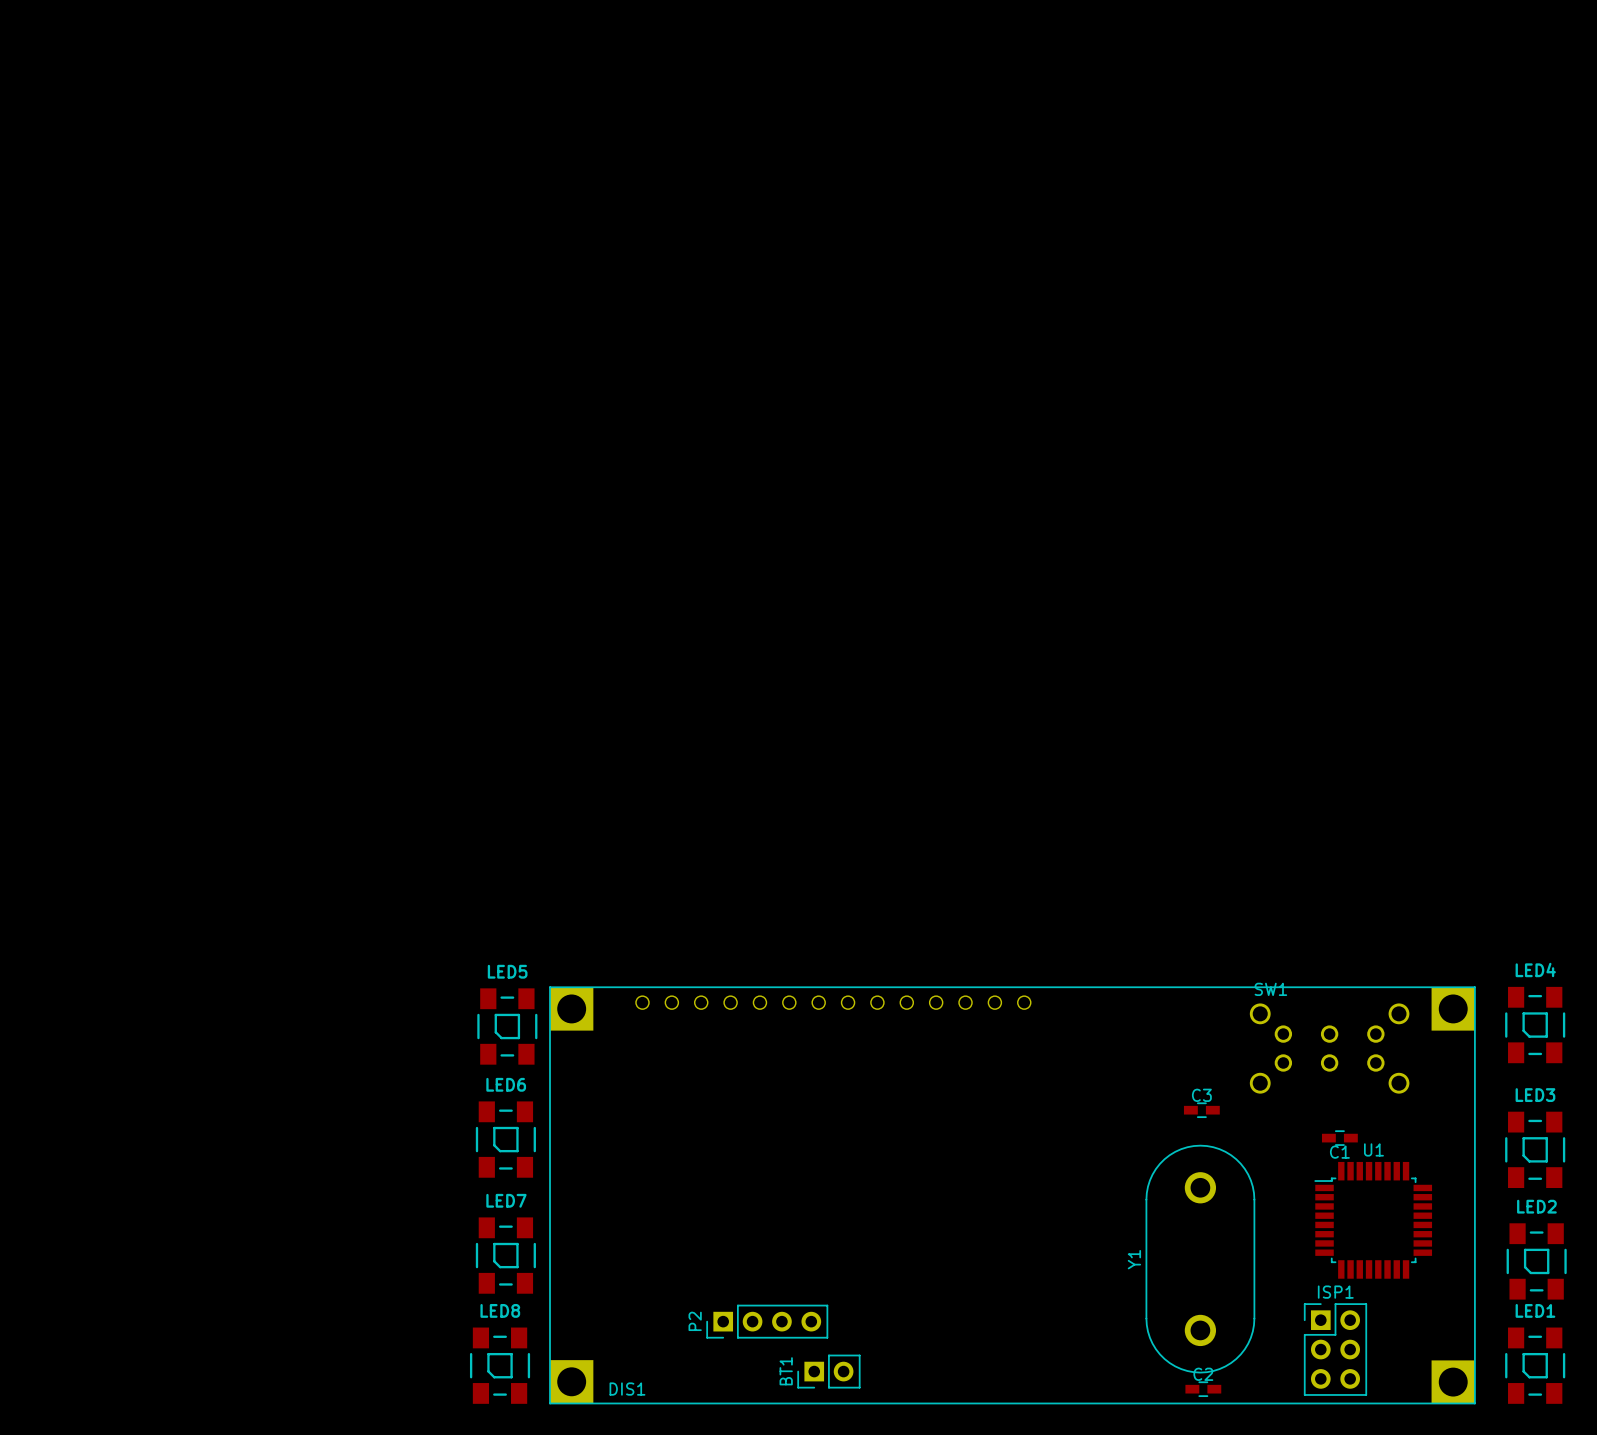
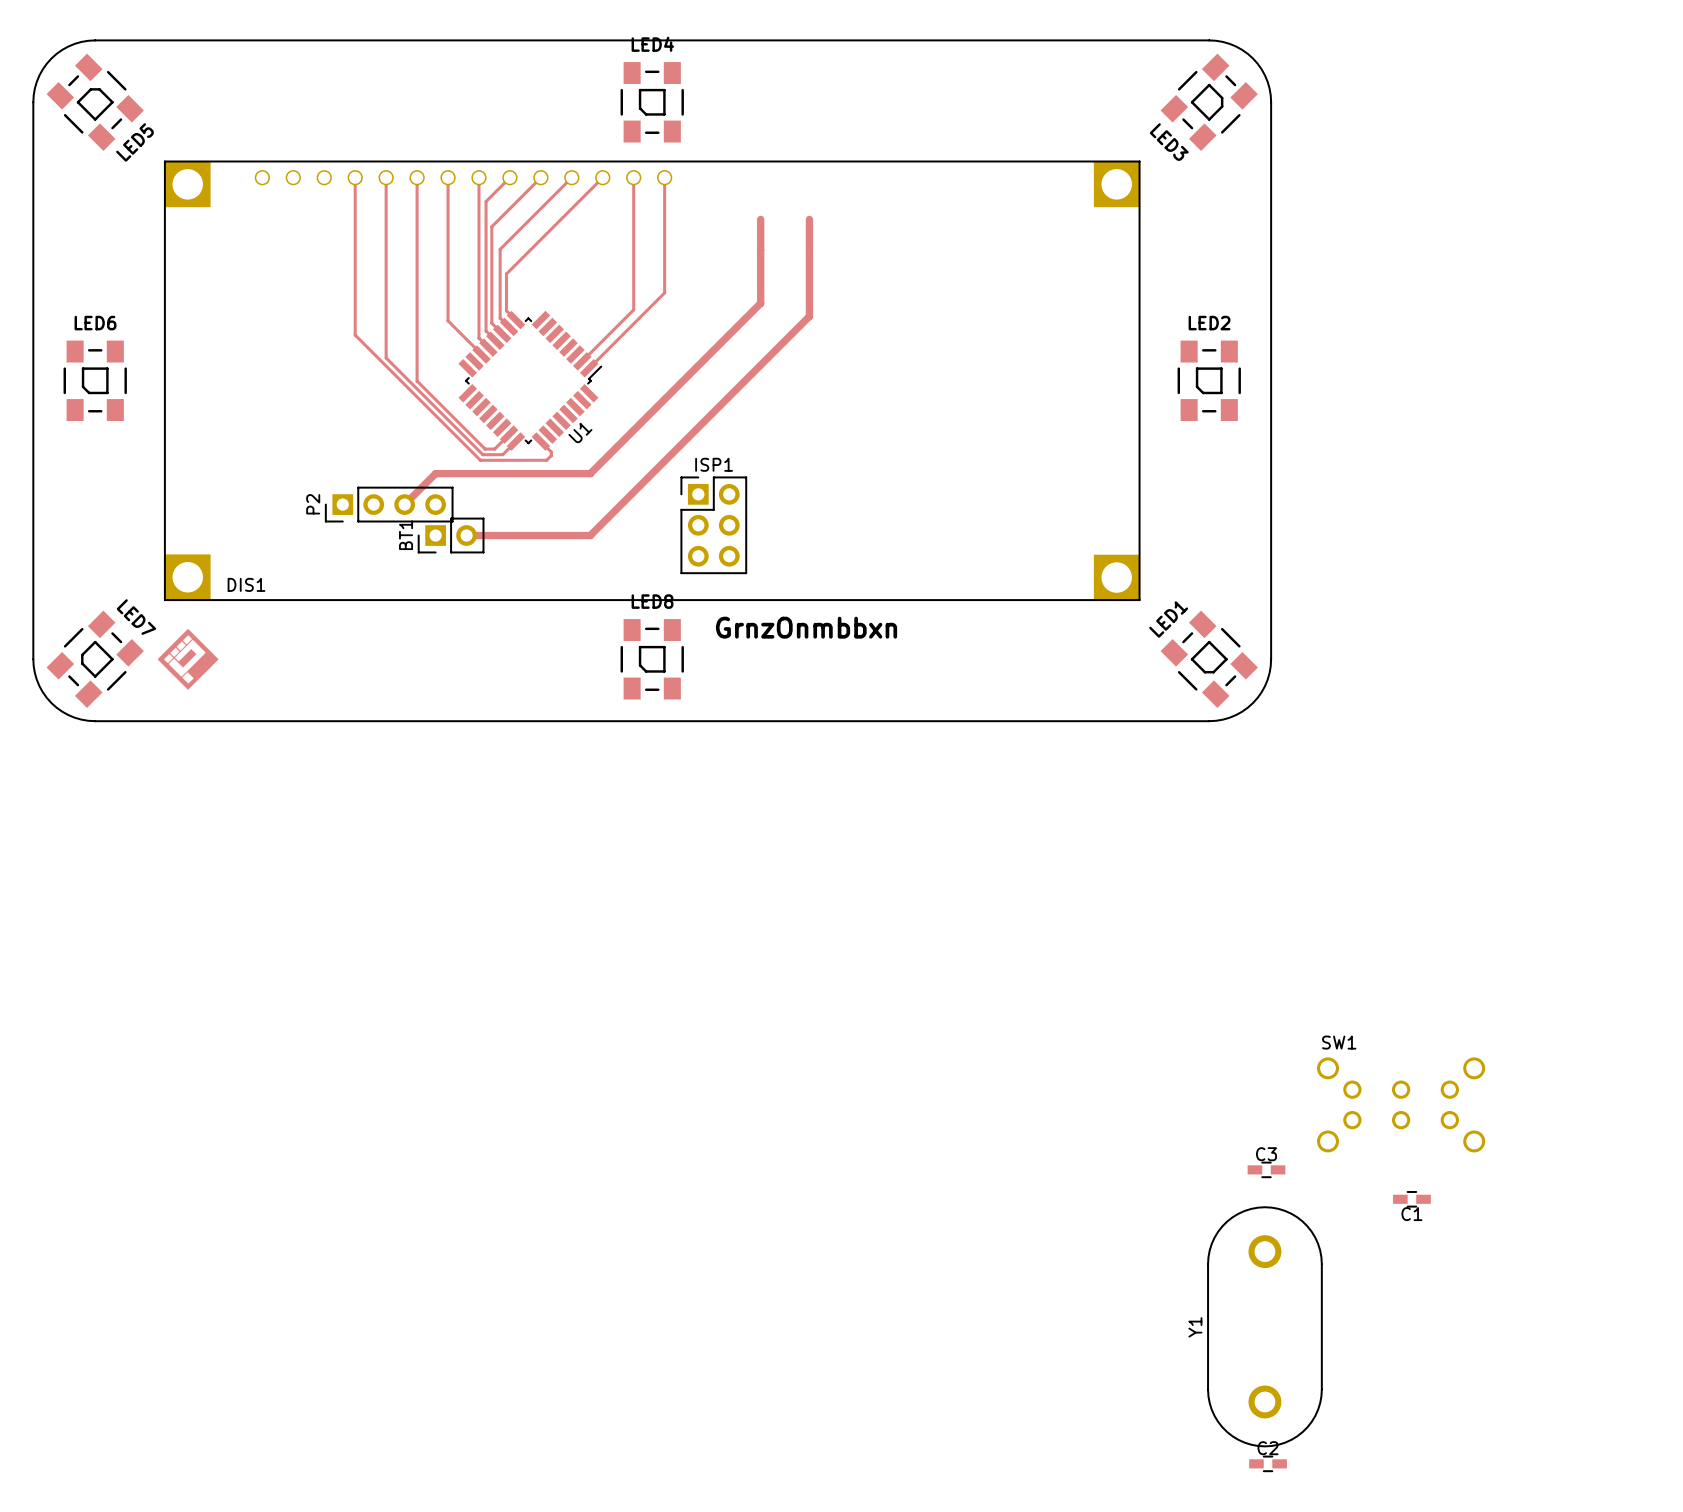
board edge: none -> (95, 40) (1209, 40) (1223, 41) (1242, 49) (1253, 58) (1265, 75) (1269, 88) (1271, 102) (1271, 659) (1267, 679) (1261, 692) (1247, 707) (1236, 715) (1223, 719) (1209, 721) (95, 721) (74, 717) (62, 711) (51, 703) (39, 686) (34, 673) (33, 659) (33, 102) (34, 88) (39, 75) (51, 58) (68, 46) (81, 41) (95, 40)
top track: none -> (355, 177) (355, 335) (480, 460) (546, 460) (551, 455) (551, 452) (540, 441)
top track: none -> (386, 177) (386, 357) (482, 454) (502, 454) (515, 441)
top track: none -> (417, 177) (417, 381) (485, 449) (494, 449) (509, 434)
top track: none -> (448, 177) (448, 320) (481, 354)
top track: none -> (478, 177) (478, 338) (488, 347)
top track: none -> (509, 177) (486, 201) (486, 331) (495, 340)
top track: none -> (540, 177) (491, 226) (491, 323) (502, 333)
top track: none -> (571, 177) (500, 249) (500, 318) (508, 326)
top track: none -> (602, 177) (506, 273) (506, 310) (515, 320)
top track: none -> (633, 177) (633, 309) (582, 361)
top track: none -> (664, 177) (664, 292) (589, 368)
top track: none -> (760, 219) (760, 303) (590, 473) (435, 473) (404, 504)
top track: none -> (809, 219) (809, 316) (590, 535) (466, 535)
text: none -> GrnzOnmbbxn (806, 627)
drawing: none -> [157, 629, 219, 690]
LED4 position: (1535, 1025) -> (652, 102)
LED5 rotation: 0° (507, 1026) -> 135° clockwise (95, 102)
LED5 position: (507, 1026) -> (95, 102)
LED6 position: (505, 1139) -> (95, 380)
LED3 rotation: 0° (1535, 1149) -> 135° counterclockwise (1209, 102)
LED3 position: (1535, 1149) -> (1209, 102)
DIS1 position: (1012, 1195) -> (652, 380)
U1 rotation: 0° (1373, 1220) -> 135° clockwise (530, 380)
U1 position: (1373, 1220) -> (530, 380)
LED7 rotation: 0° (505, 1255) -> 45° clockwise (95, 659)
LED7 position: (505, 1255) -> (95, 659)
LED2 position: (1536, 1261) -> (1209, 380)
P2 position: (767, 1321) -> (389, 504)
ISP1 position: (1335, 1349) -> (713, 525)
LED8 position: (500, 1365) -> (652, 659)
LED1 rotation: 0° (1535, 1365) -> 45° counterclockwise (1209, 659)
LED1 position: (1535, 1365) -> (1209, 659)
BT1 position: (828, 1371) -> (451, 535)

